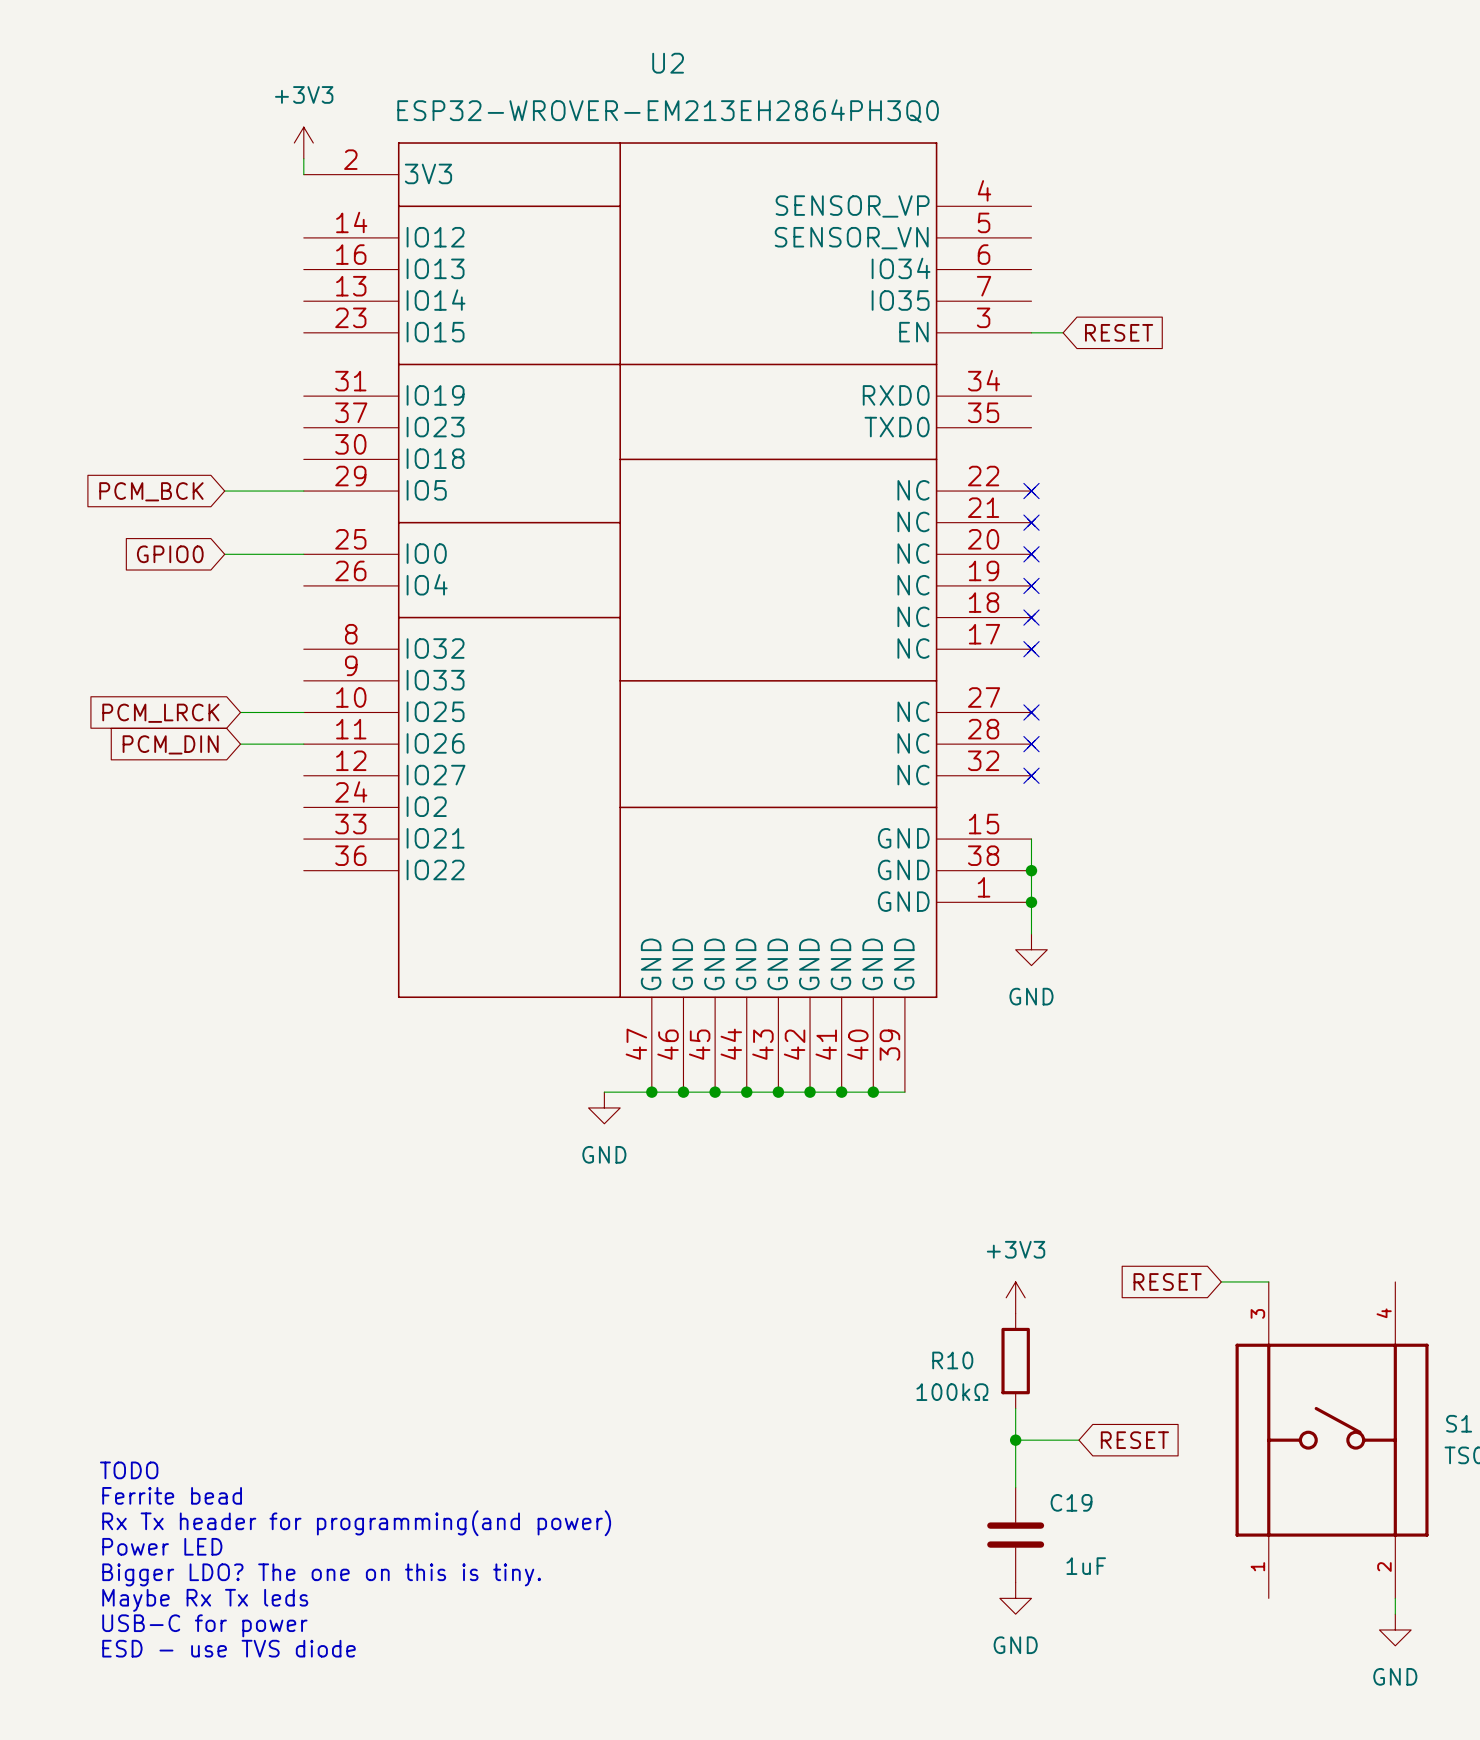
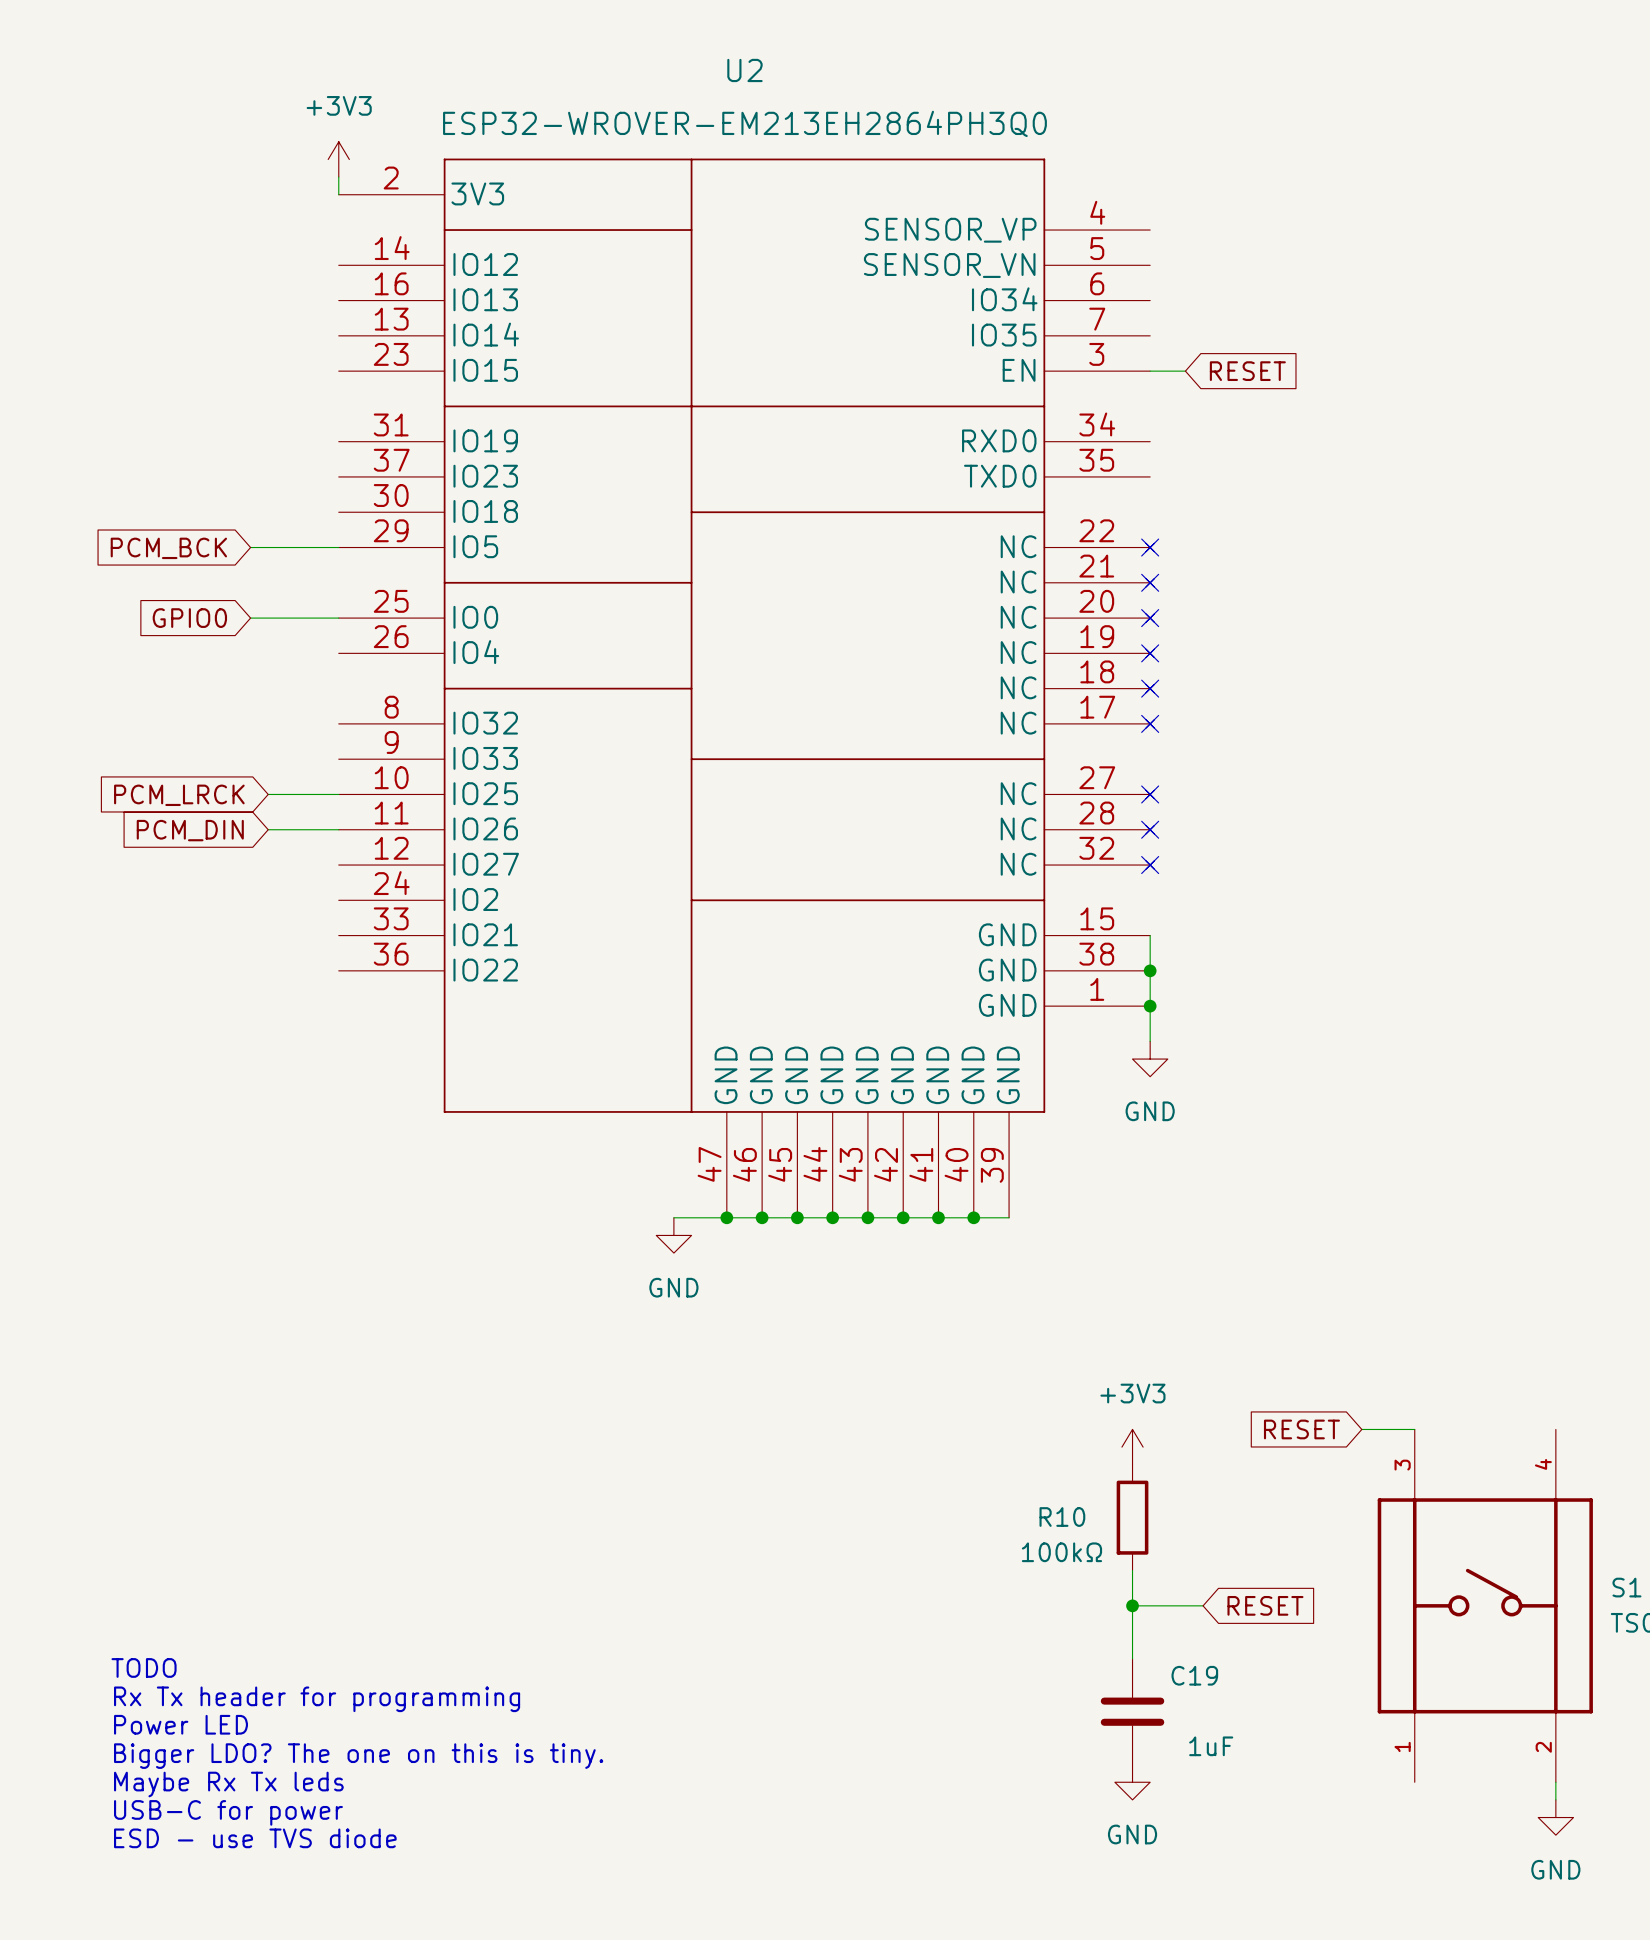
text: TODO (129, 1470) -> none
text: Ferrite bead (172, 1495) -> TODO (144, 1667)
text: Rx Tx header for programming(and power) (356, 1523) -> Rx Tx header for programming (317, 1699)

